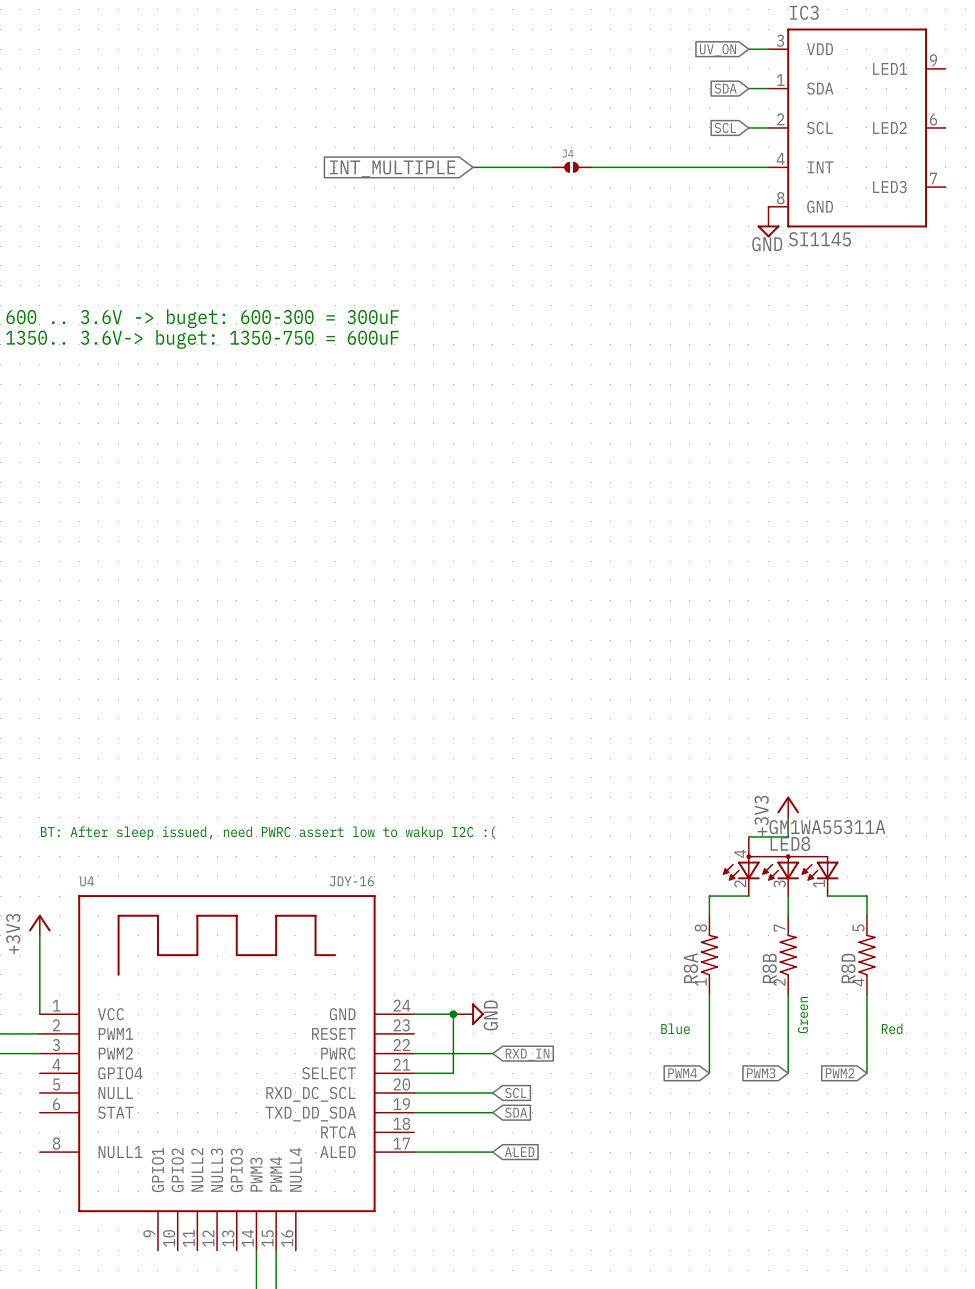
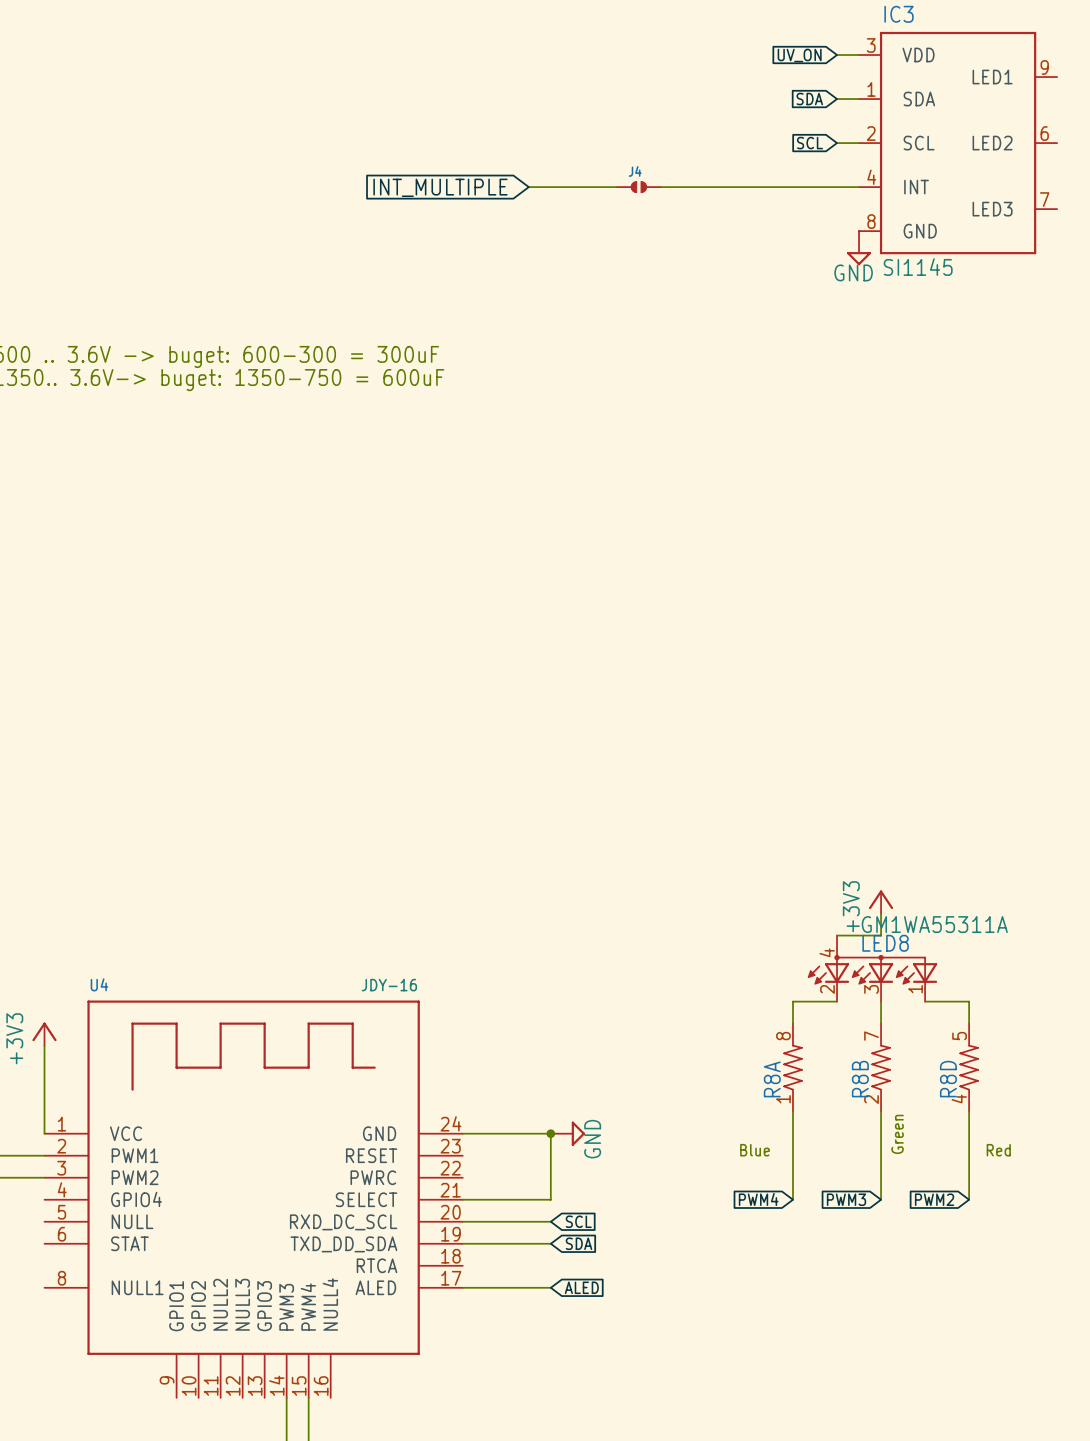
text: BT: After sleep issued, need PWRC assert low to wakup I2C :( (268, 833) -> none
wire: (453, 1014) (453, 1073) -> (506, 1133) (550, 1133) (550, 1199) (506, 1199)
junction position: (453, 1014) -> (550, 1133)
power symbol position: GND (468, 1014) -> GND (567, 1133)
wire: (414, 1053) (492, 1053) -> none
global label: RXD_IN (527, 1054) -> none

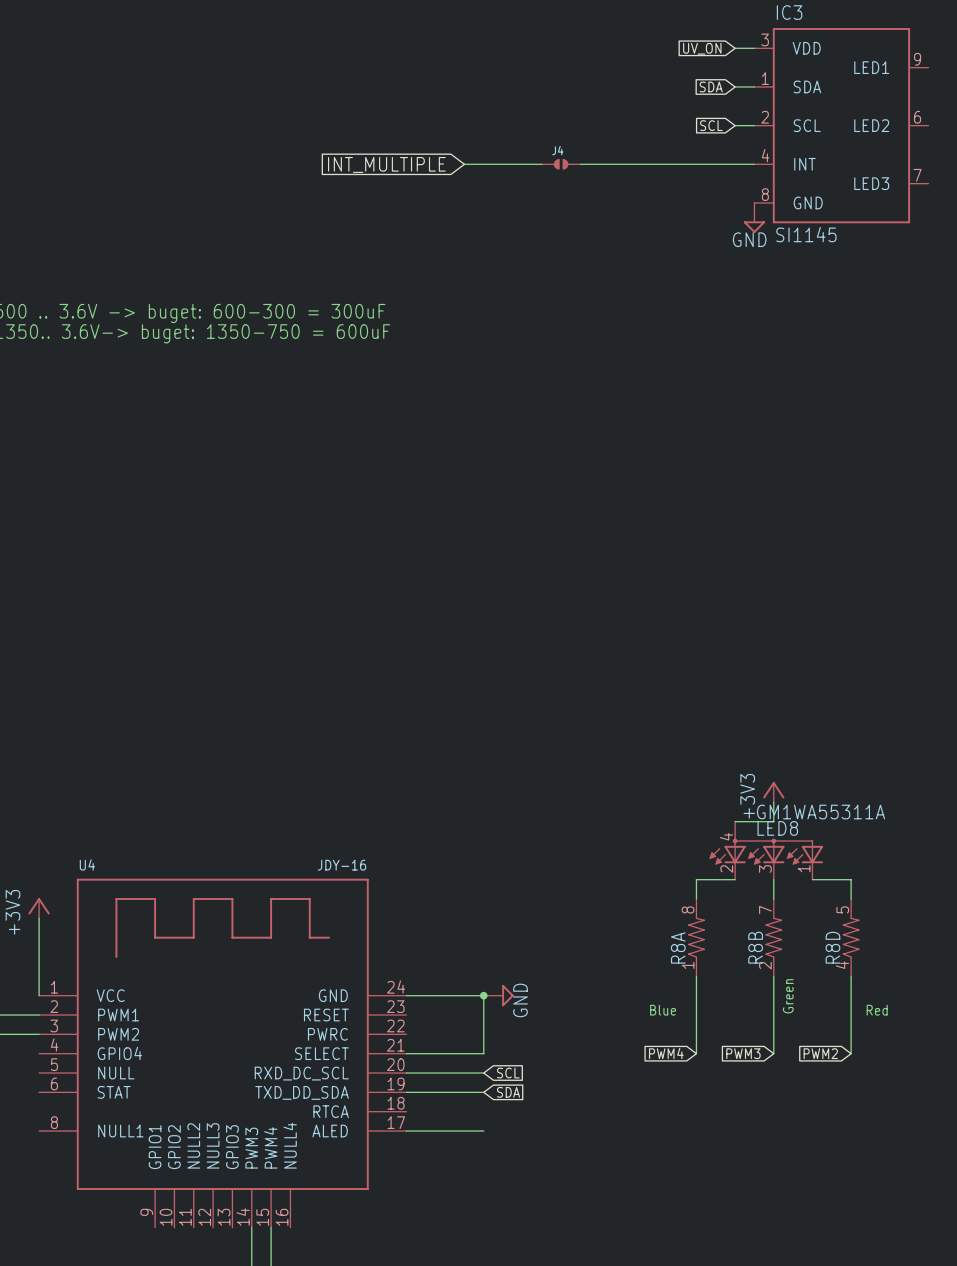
global label: ALED (581, 1287) -> none

